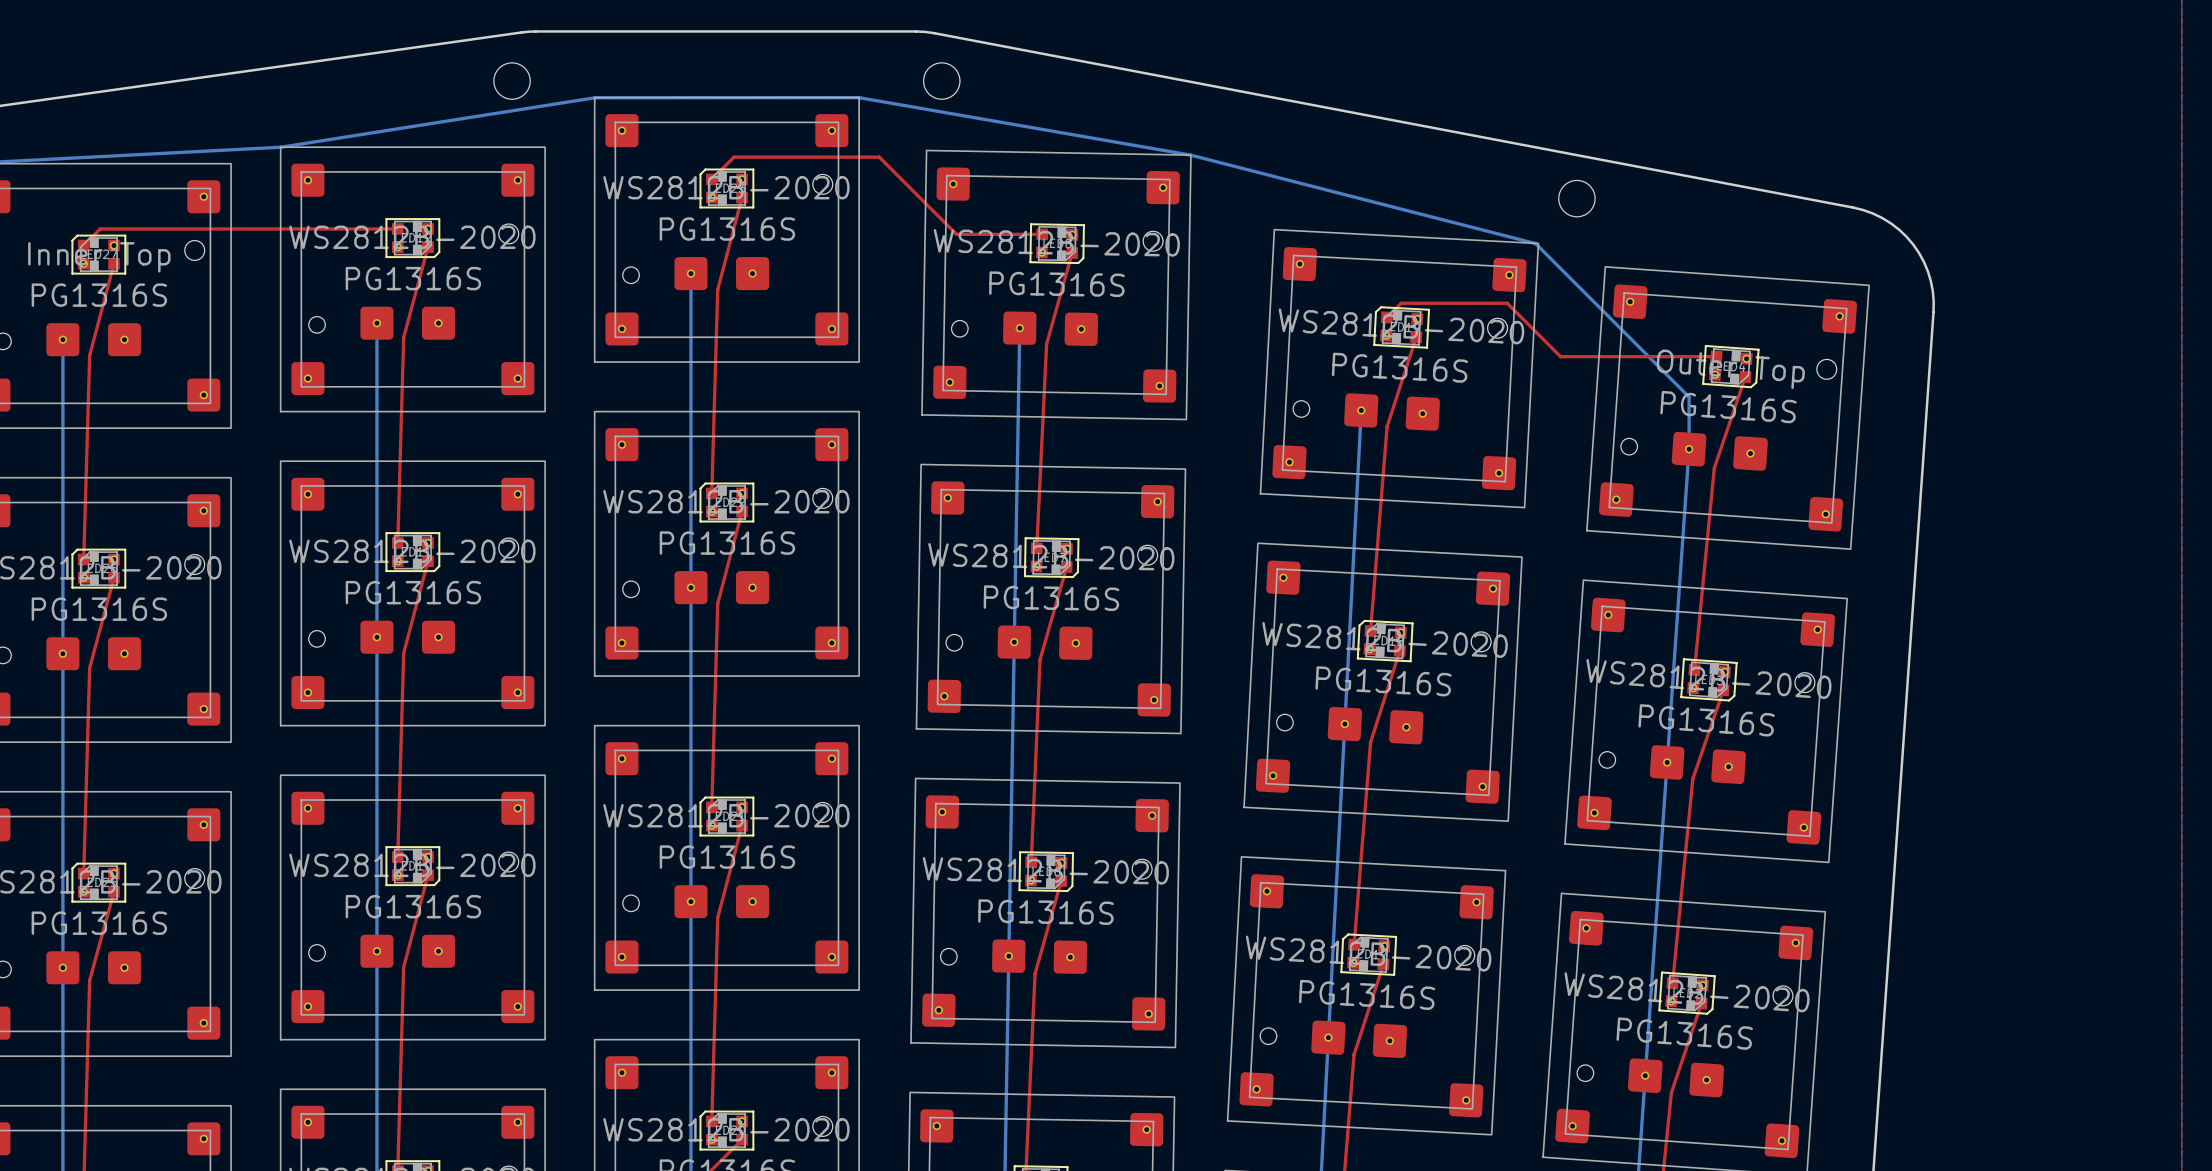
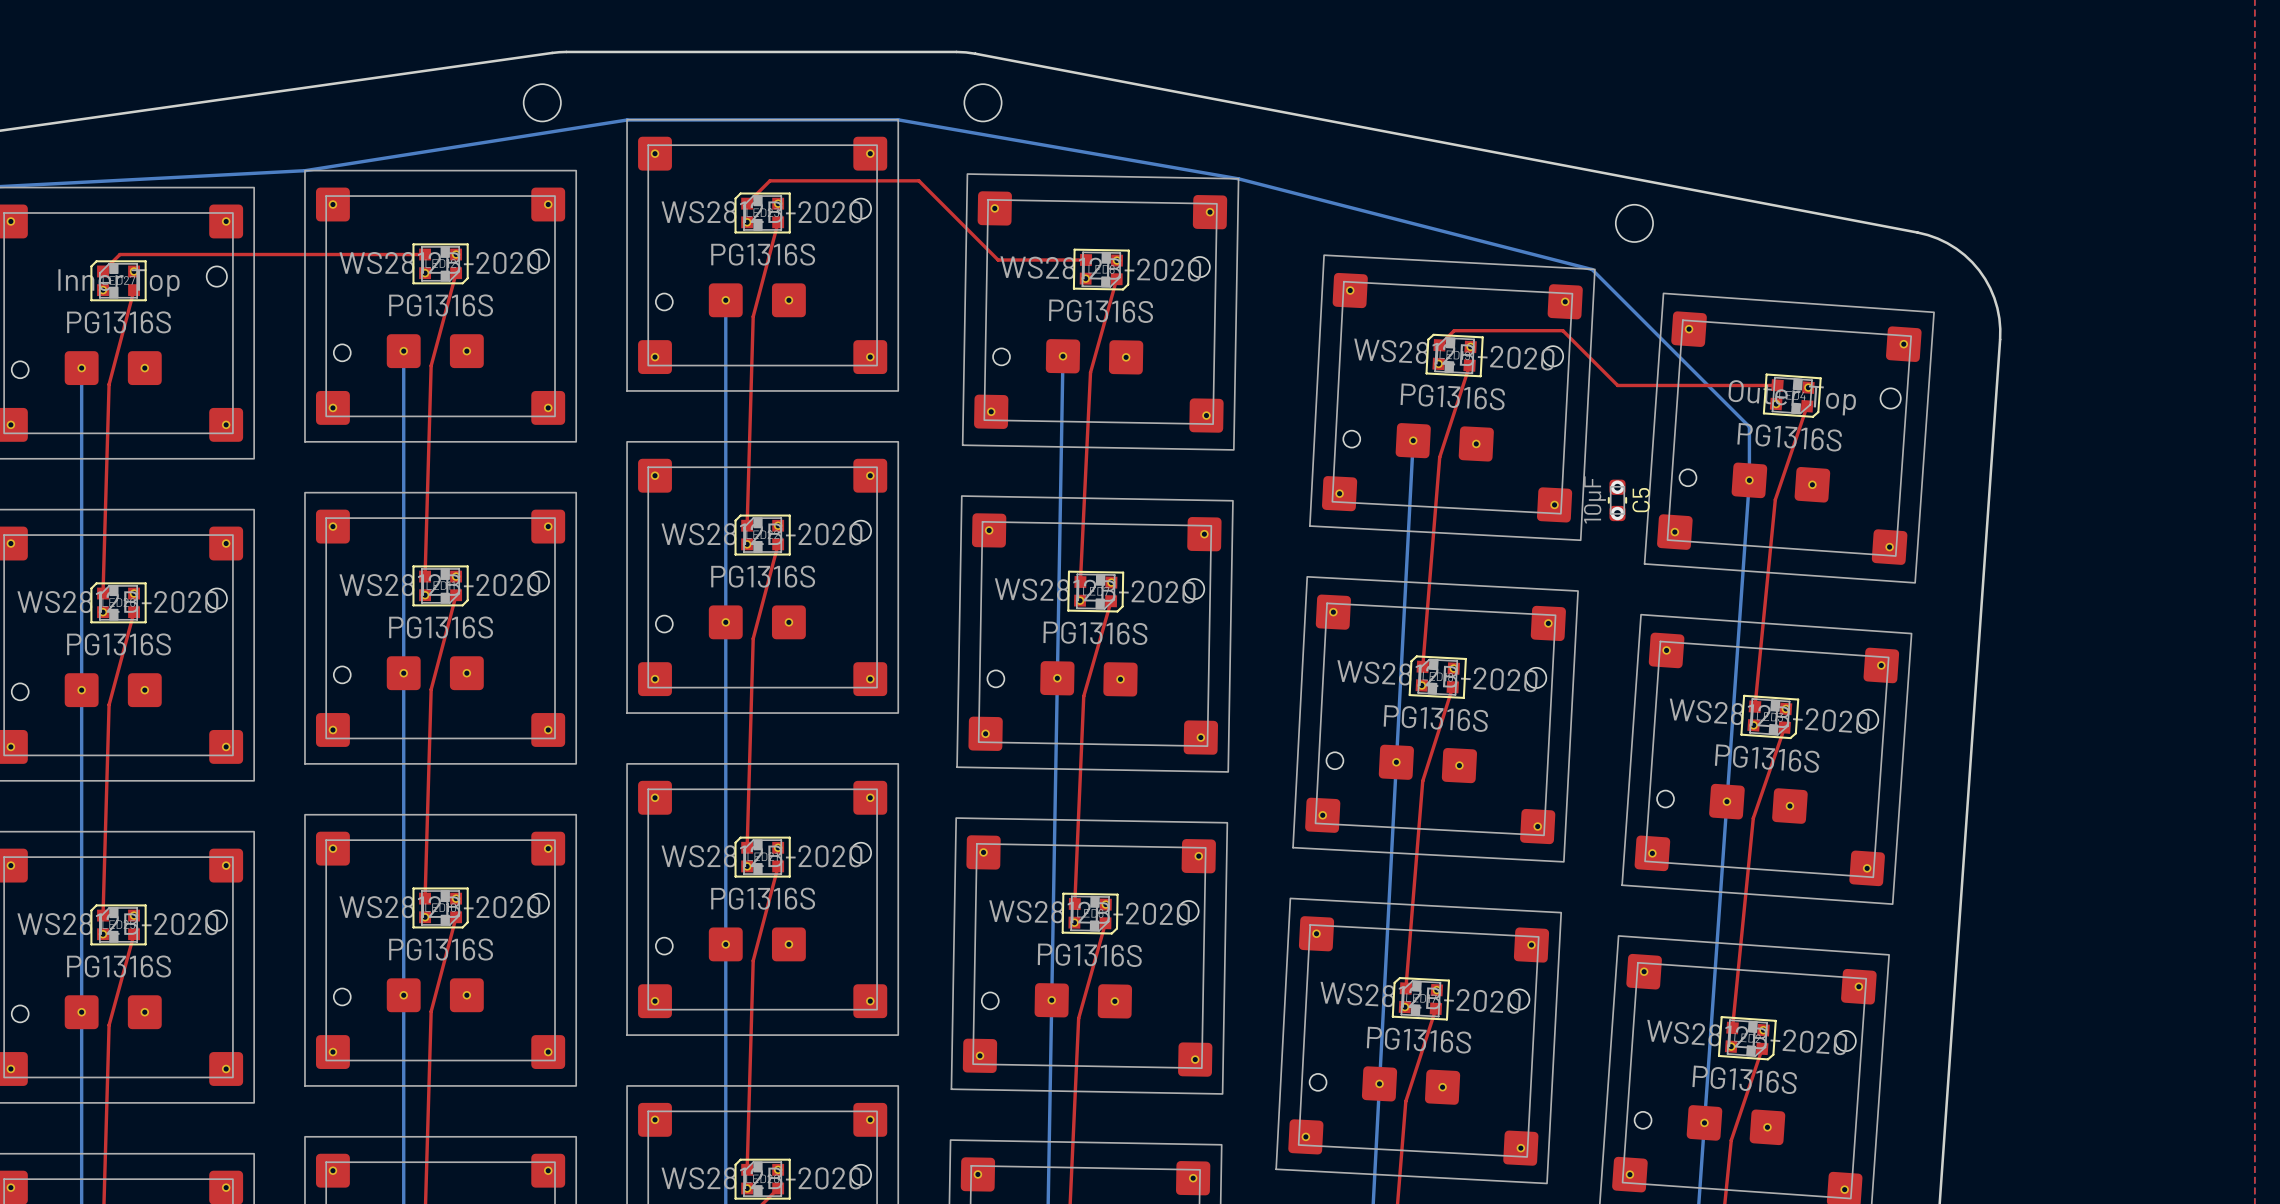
via: none -> (1617, 487)
C5: none -> 10μF (1617, 500)
via: none -> (1617, 513)

